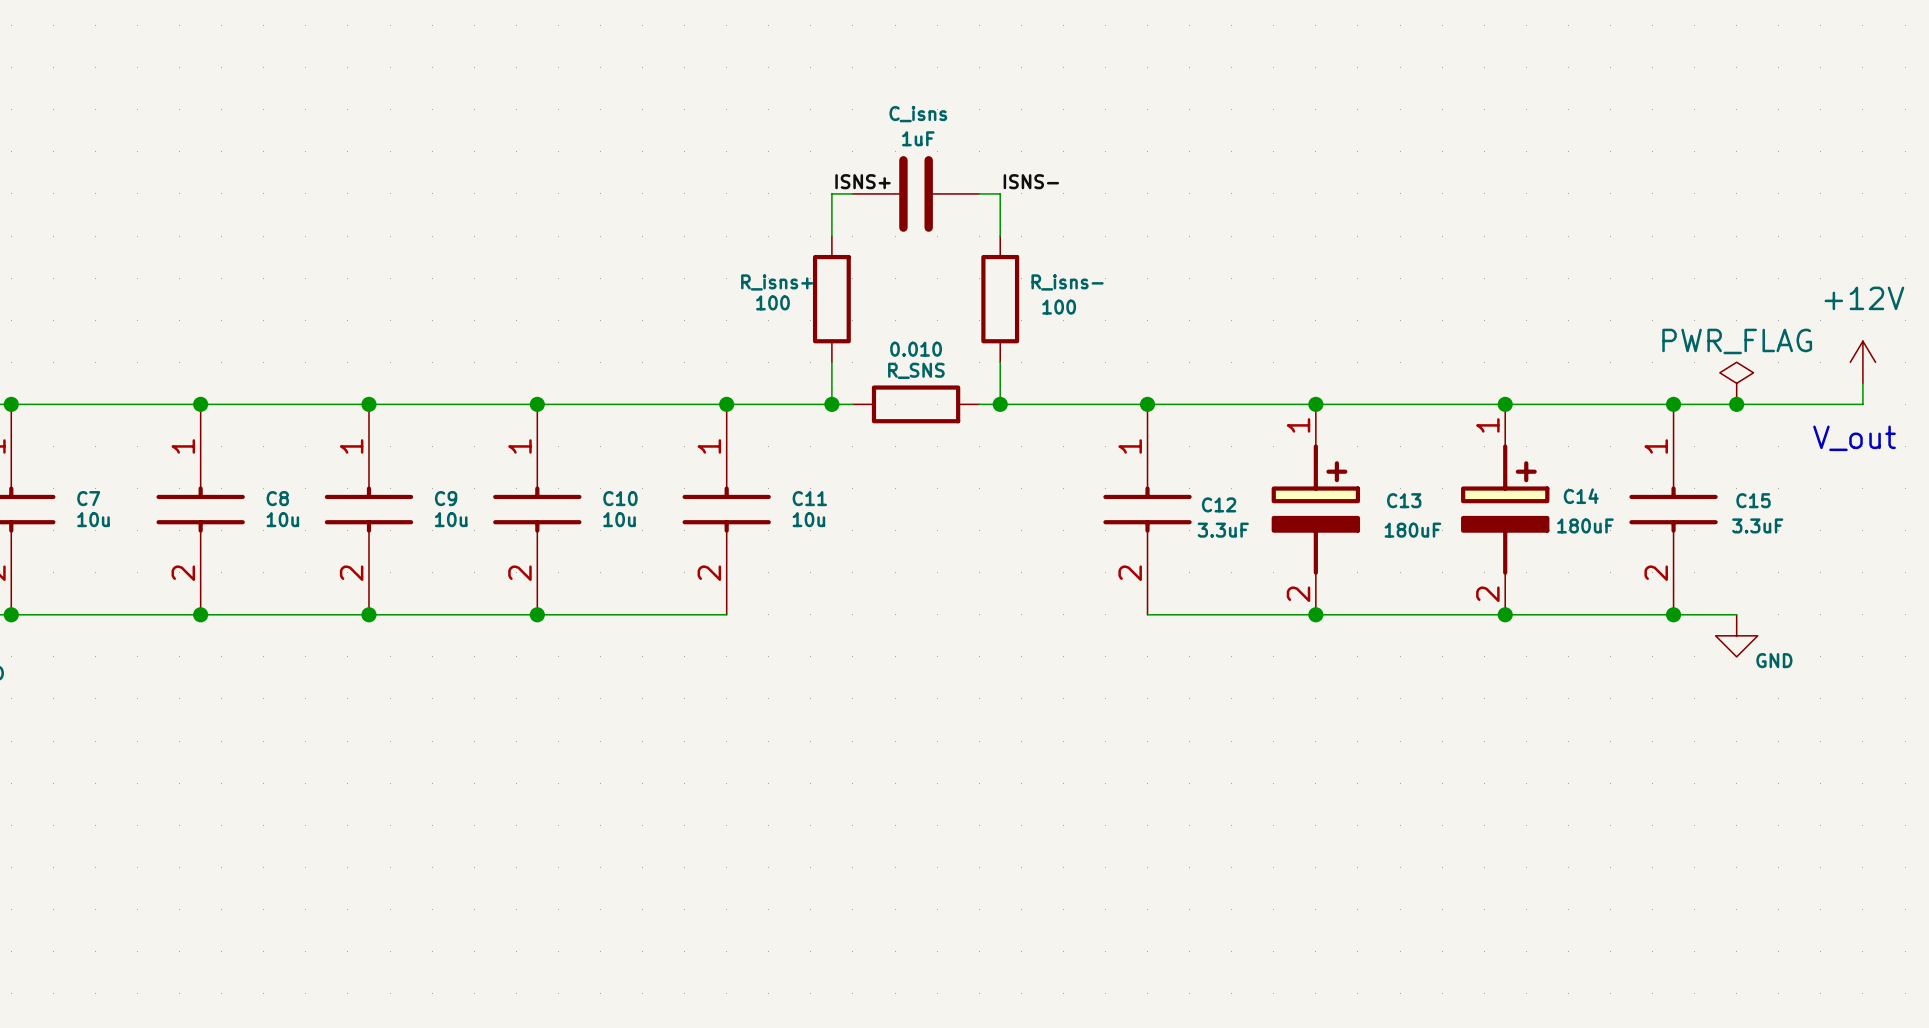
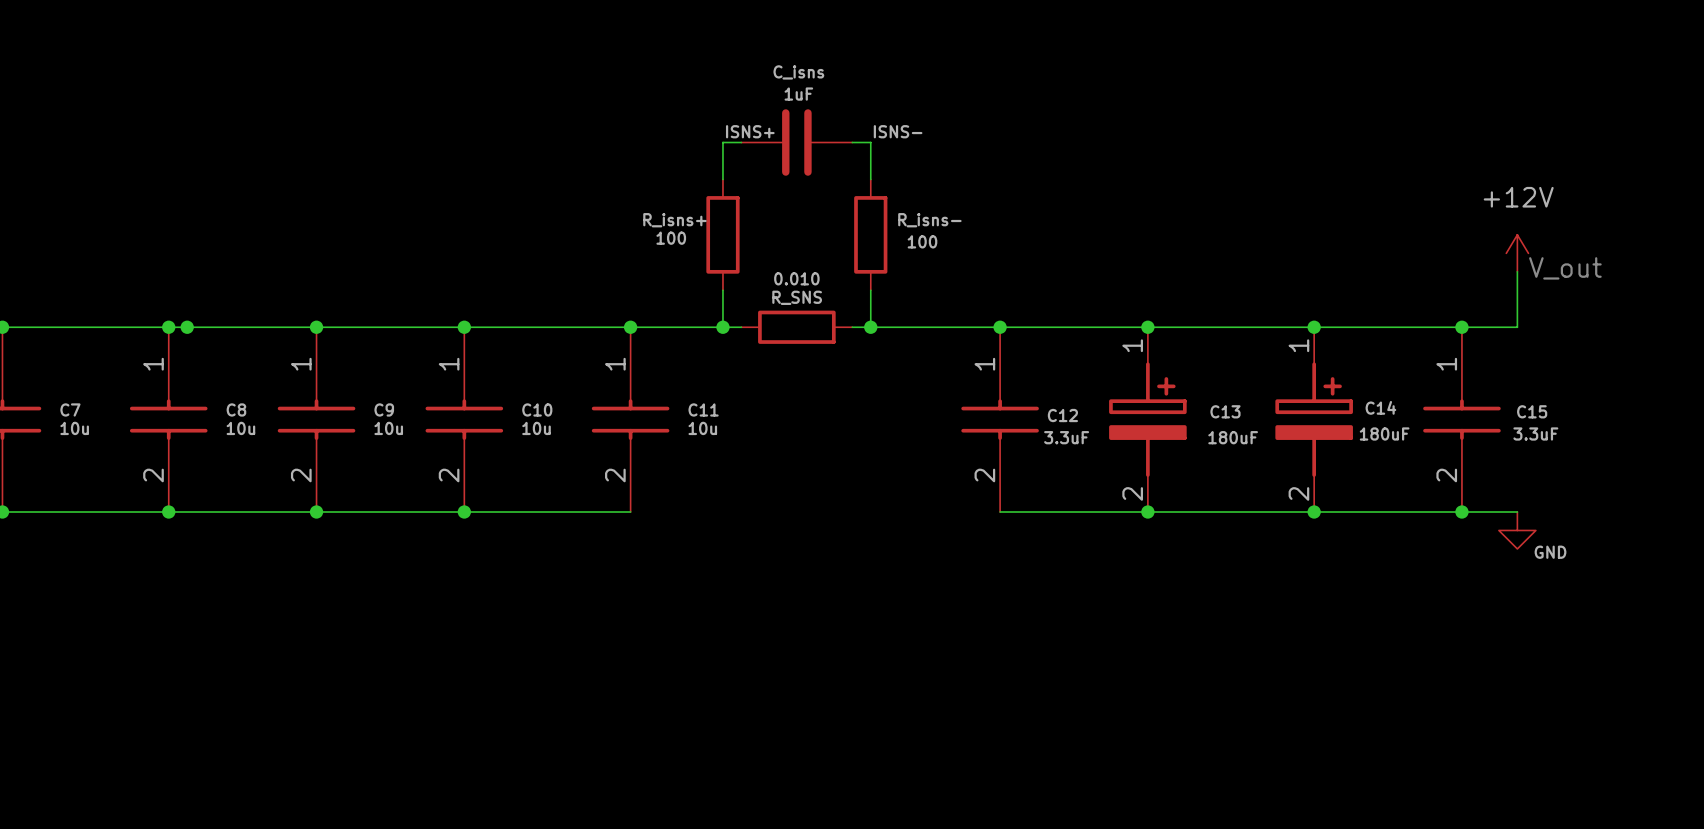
power symbol position: +12V (1862, 362) -> +12V (1517, 253)
power symbol: PWR_FLAG (1736, 383) -> none
wire: (1862, 383) (1862, 404) (1736, 404) -> (1517, 271) (1517, 327)
junction: none -> (187, 327)
junction: (1736, 404) -> none
text position: V_out (1854, 438) -> V_out (1565, 268)

